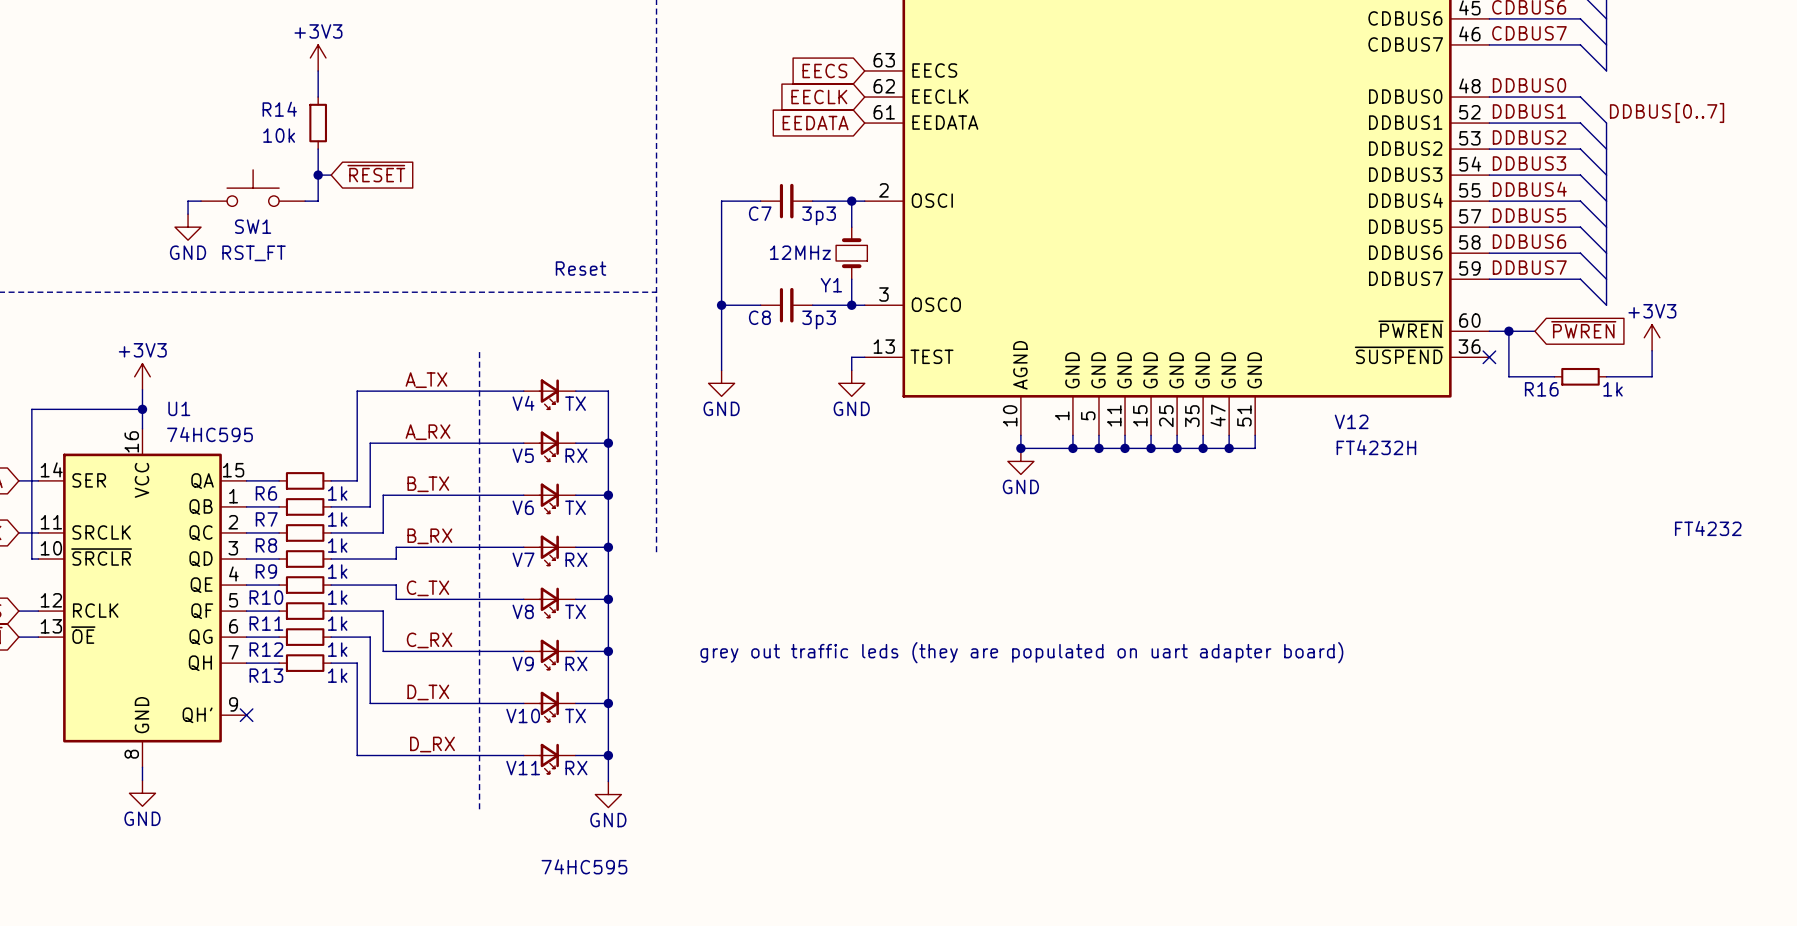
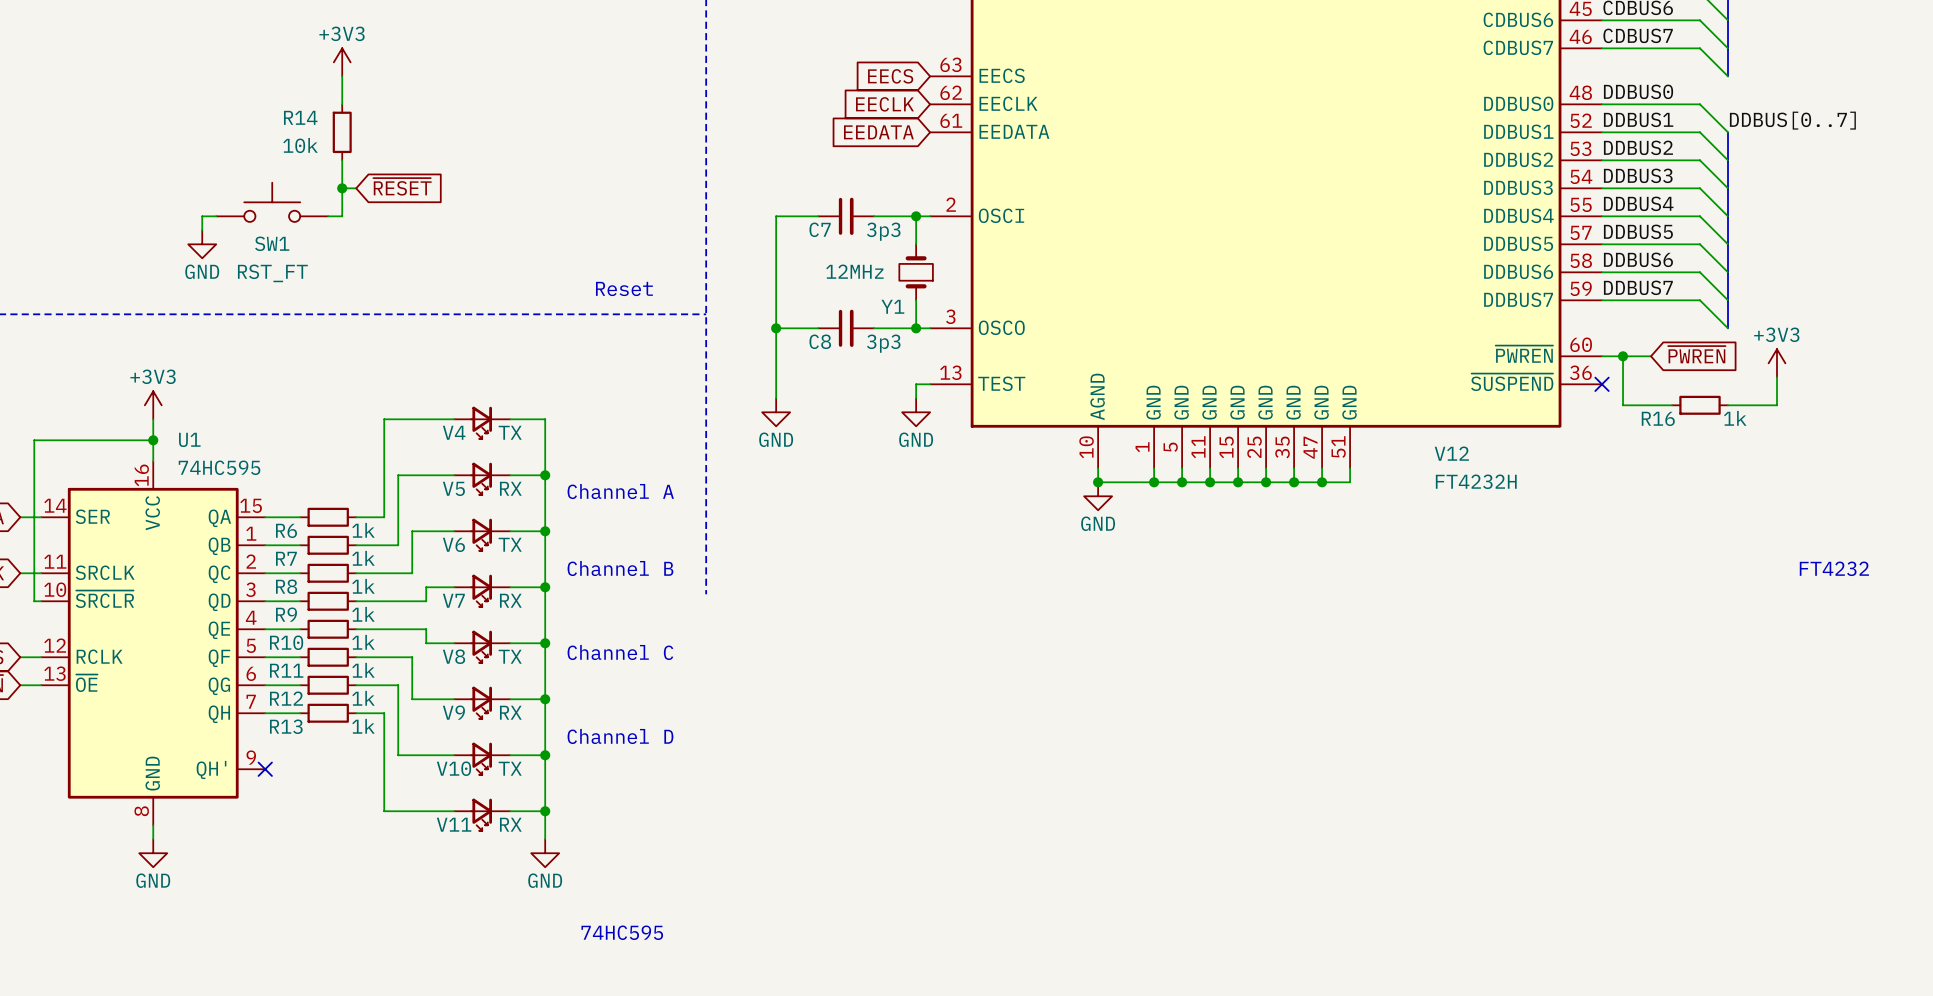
line: (479, 352) (479, 812) -> none
label: A_TX (426, 380) -> none
wire: (357, 391) (523, 391) -> (384, 420) (454, 419)
wire: (575, 391) (608, 391) (608, 781) -> (510, 419) (545, 419) (545, 839)
V4 position: (549, 394) -> (482, 422)
label: A_RX (428, 432) -> none
junction: none -> (545, 475)
wire: (370, 443) (523, 443) -> (398, 476) (454, 475)
wire: (575, 443) (608, 443) -> (510, 475) (545, 475)
junction: (608, 443) -> none
V5 position: (549, 446) -> (482, 478)
text: none -> Channel A (620, 491)
label: B_TX (428, 484) -> none
junction: none -> (545, 531)
wire: (383, 495) (523, 495) -> (412, 532) (454, 531)
wire: (575, 495) (608, 495) -> (510, 531) (545, 531)
junction: (608, 495) -> none
V6 position: (549, 498) -> (482, 534)
text: none -> Channel B (620, 568)
label: B_RX (429, 536) -> none
junction: none -> (545, 587)
wire: (396, 547) (523, 547) -> (426, 588) (454, 587)
wire: (575, 547) (608, 547) -> (510, 587) (545, 587)
junction: (608, 547) -> none
V7 position: (549, 550) -> (482, 590)
label: C_TX (428, 588) -> none
wire: (396, 598) (523, 599) -> (426, 643) (454, 643)
junction: none -> (545, 643)
wire: (575, 599) (608, 599) -> (510, 643) (545, 643)
junction: (608, 599) -> none
V8 position: (549, 602) -> (482, 646)
text: none -> Channel C (620, 652)
label: C_RX (429, 640) -> none
wire: (383, 650) (523, 651) -> (412, 699) (454, 699)
junction: none -> (545, 699)
wire: (575, 651) (608, 651) -> (510, 699) (545, 699)
junction: (608, 651) -> none
text: grey out traffic leds (they are populated on uart adapter board) (1021, 652) -> none
V9 position: (549, 654) -> (482, 702)
text: none -> Channel D (620, 736)
label: D_TX (428, 692) -> none
wire: (370, 702) (523, 703) -> (398, 755) (454, 755)
junction: none -> (545, 755)
wire: (575, 703) (608, 703) -> (510, 755) (545, 755)
junction: (608, 703) -> none
V10 position: (549, 706) -> (482, 758)
label: D_RX (432, 744) -> none
wire: (357, 754) (523, 755) -> (384, 811) (454, 811)
junction: none -> (545, 811)
wire: (575, 755) (608, 755) -> (510, 811) (545, 811)
junction: (608, 755) -> none
V11 position: (549, 758) -> (482, 814)
power symbol position: GND (608, 794) -> GND (545, 853)

